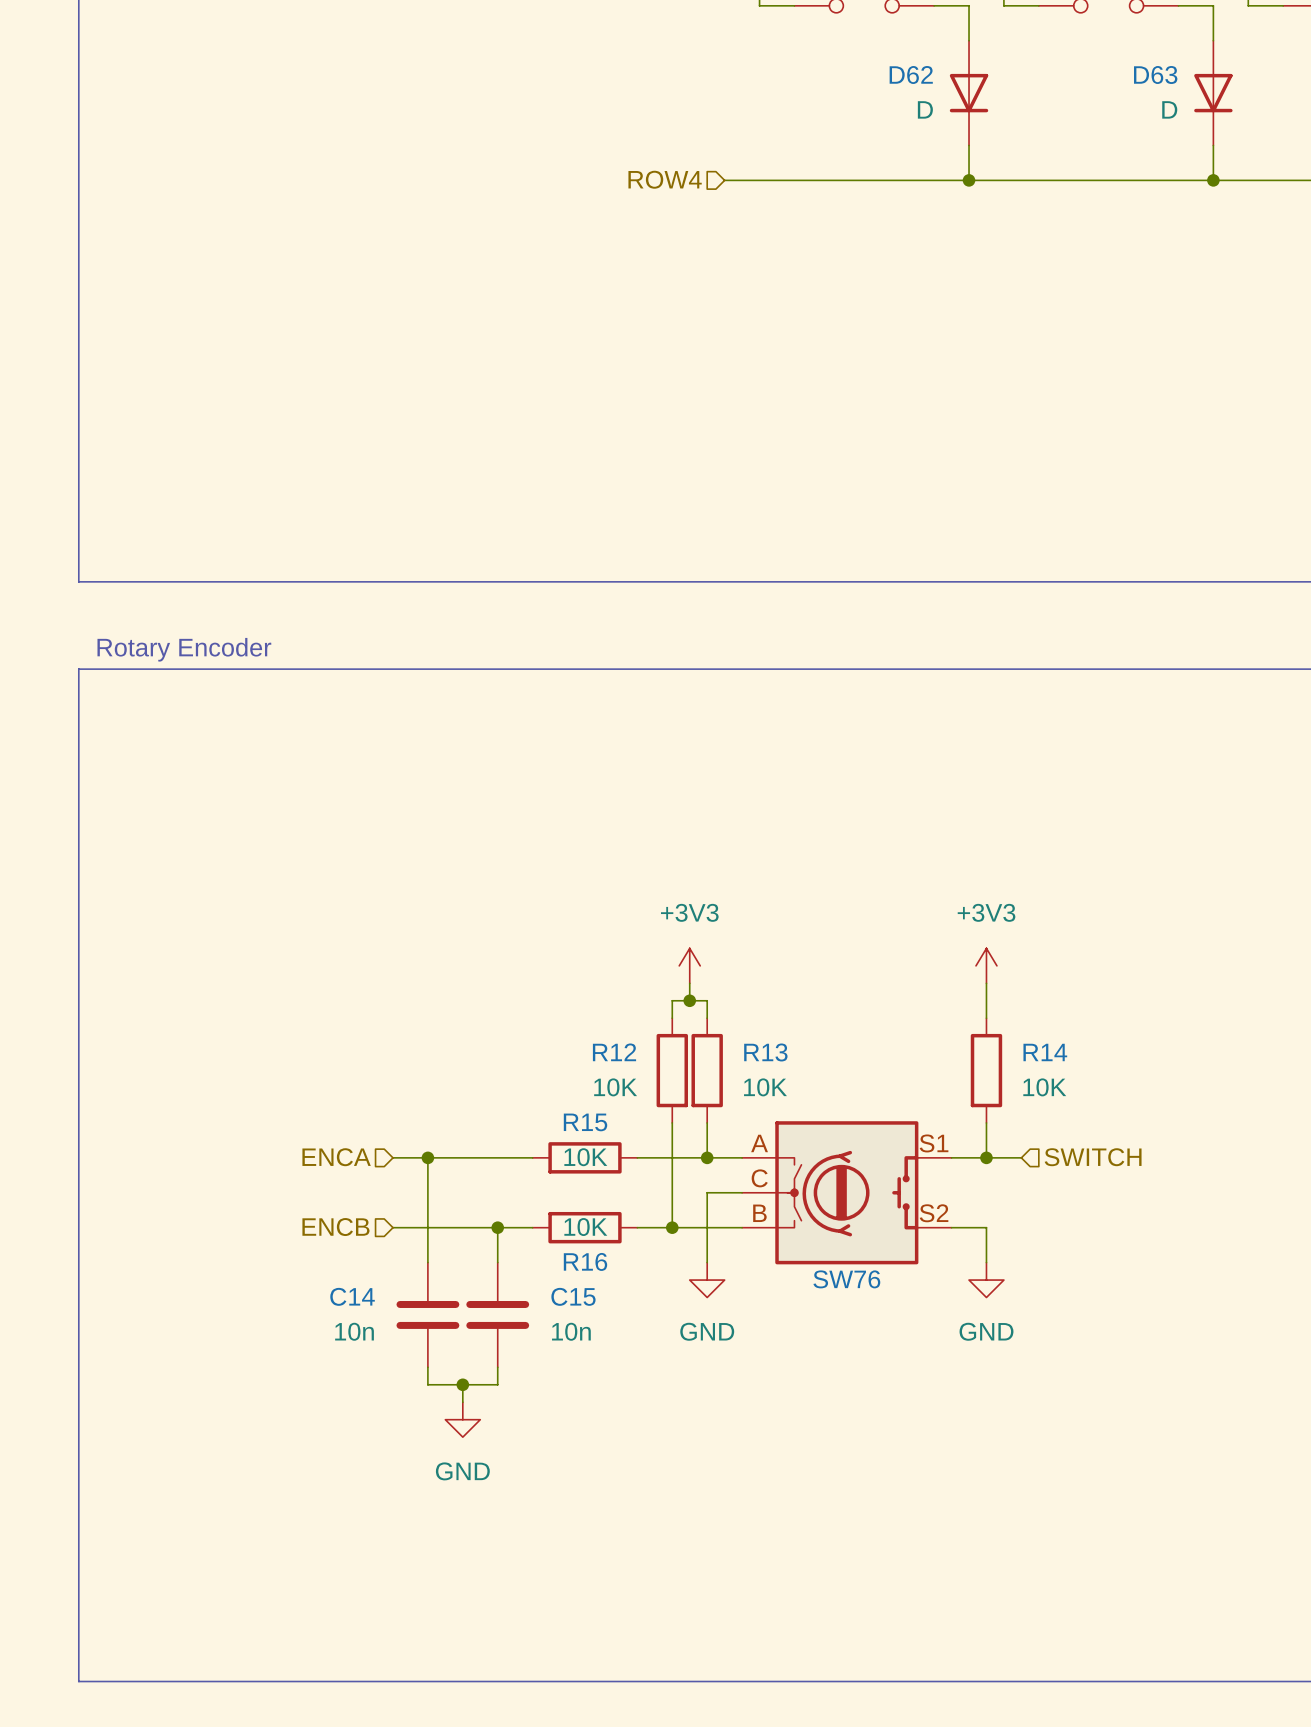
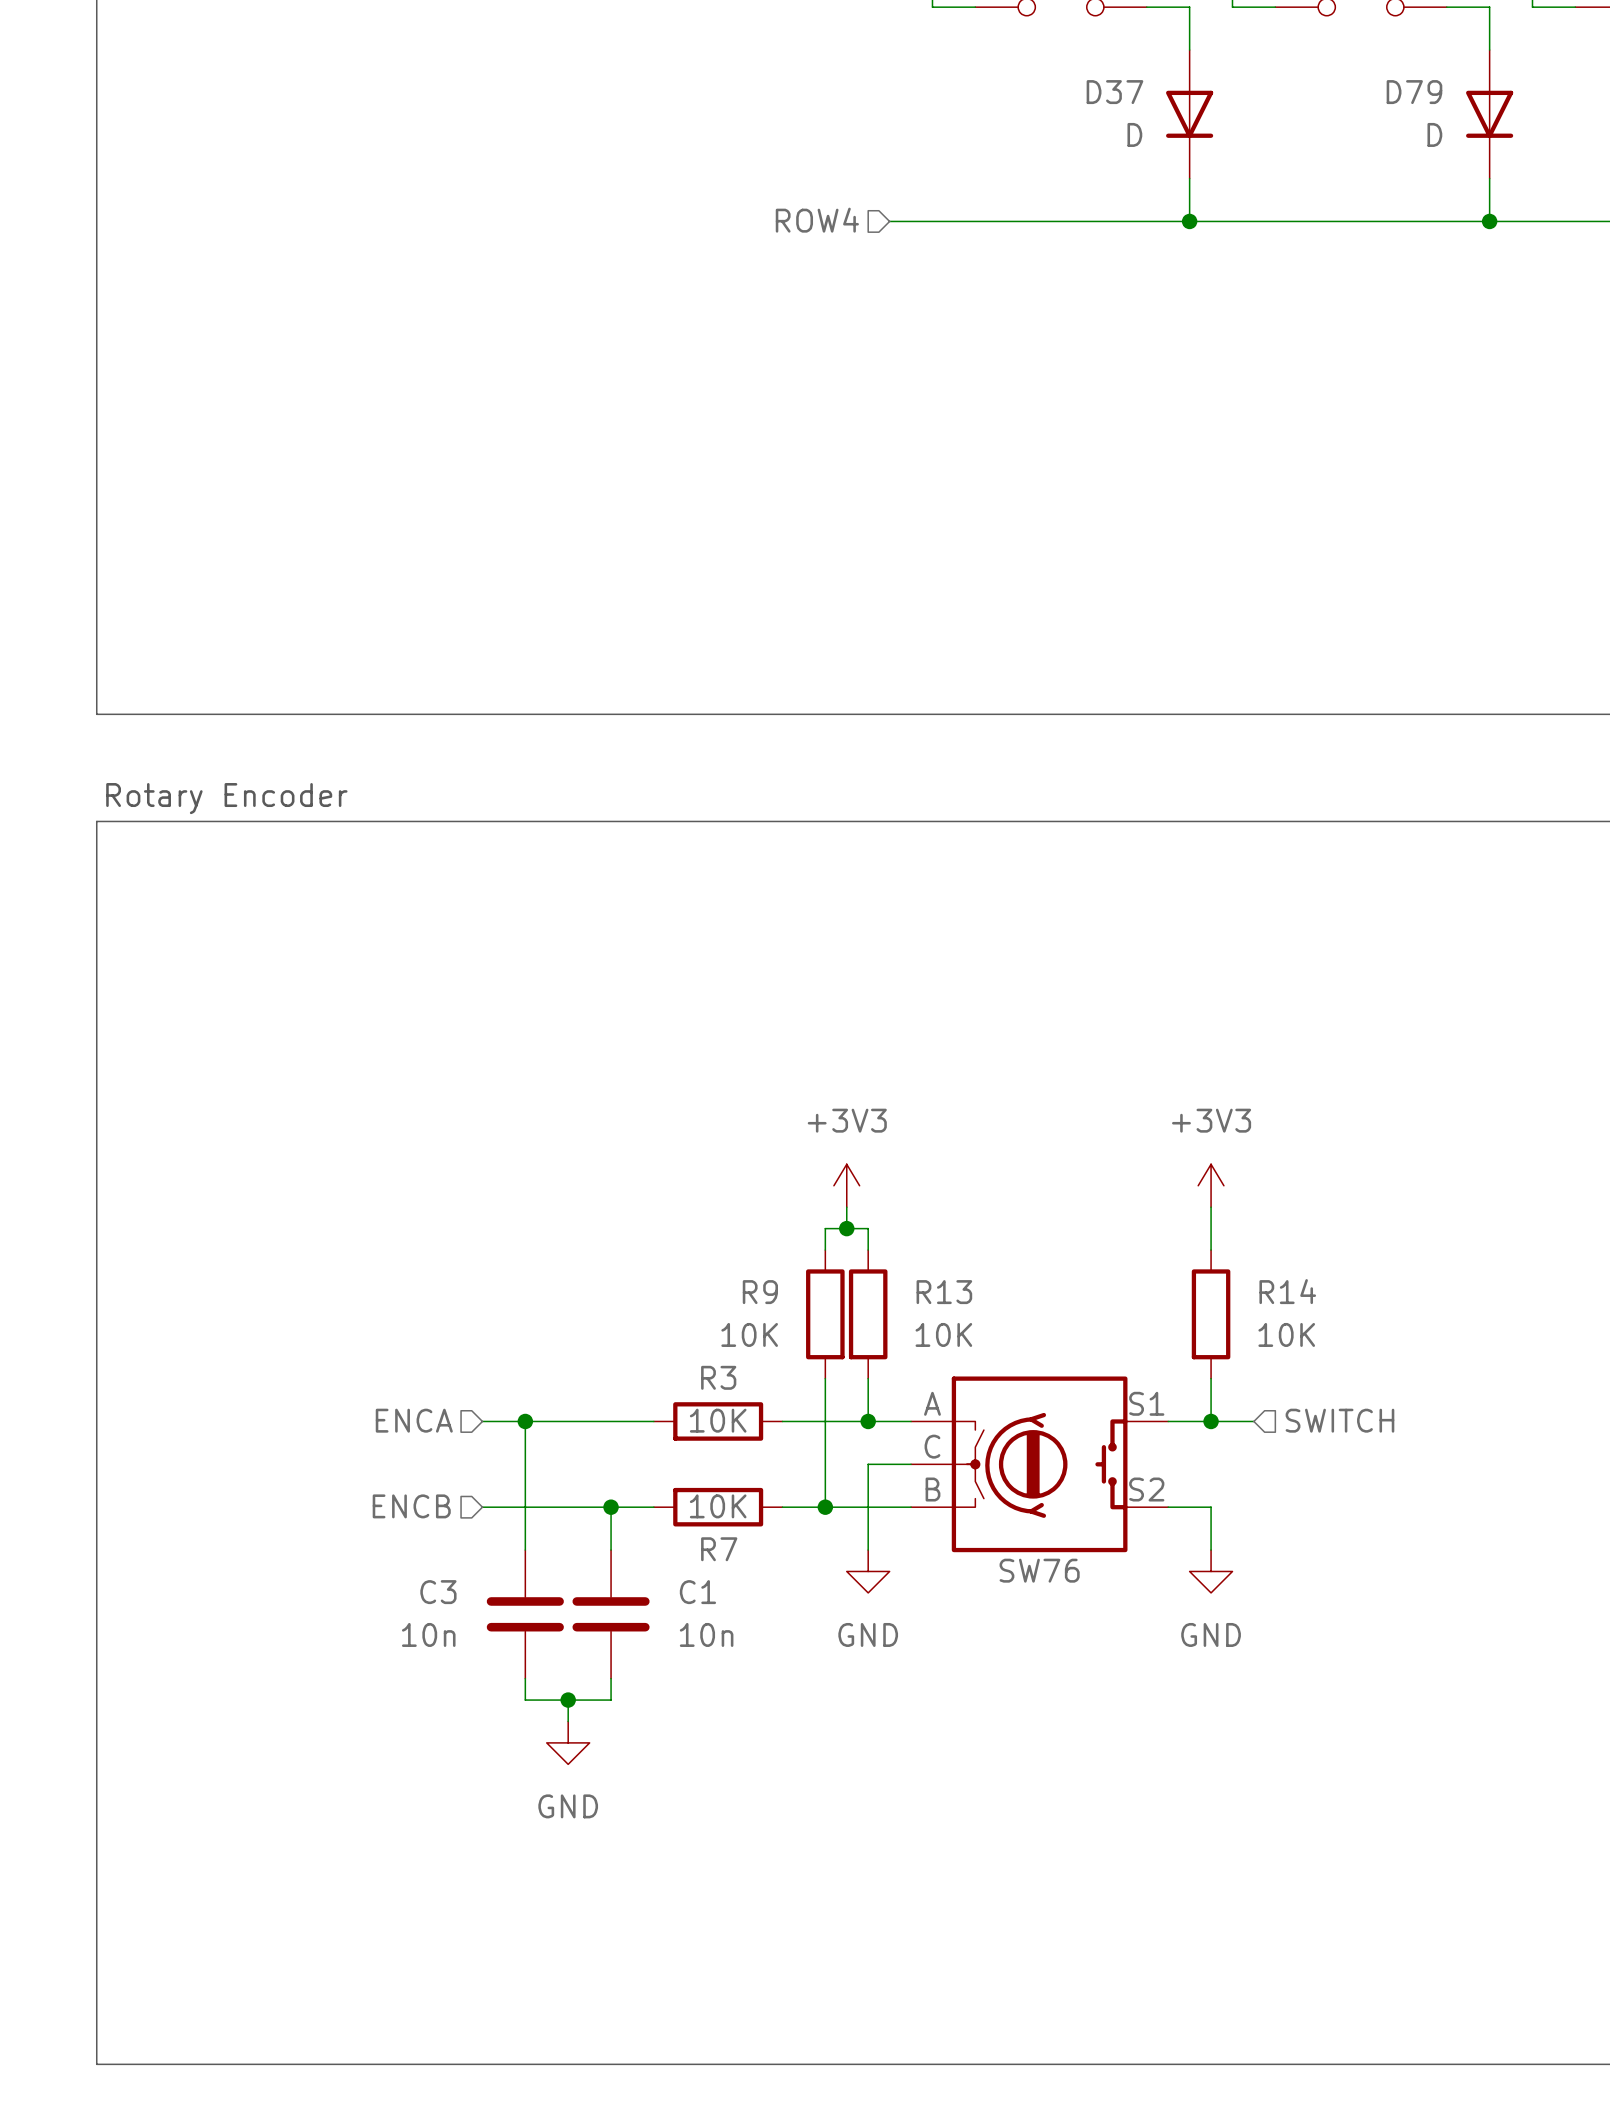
D62 name: D62 (911, 75) -> D37 (1114, 92)
D63 name: D63 (1155, 75) -> D79 (1414, 92)
R12 name: R12 (614, 1052) -> R9 (760, 1292)
R15 name: R15 (585, 1122) -> R3 (718, 1377)
R16 name: R16 (585, 1261) -> R7 (719, 1549)
C14 name: C14 (352, 1296) -> C3 (438, 1592)
C15 name: C15 (573, 1296) -> C1 (697, 1592)

